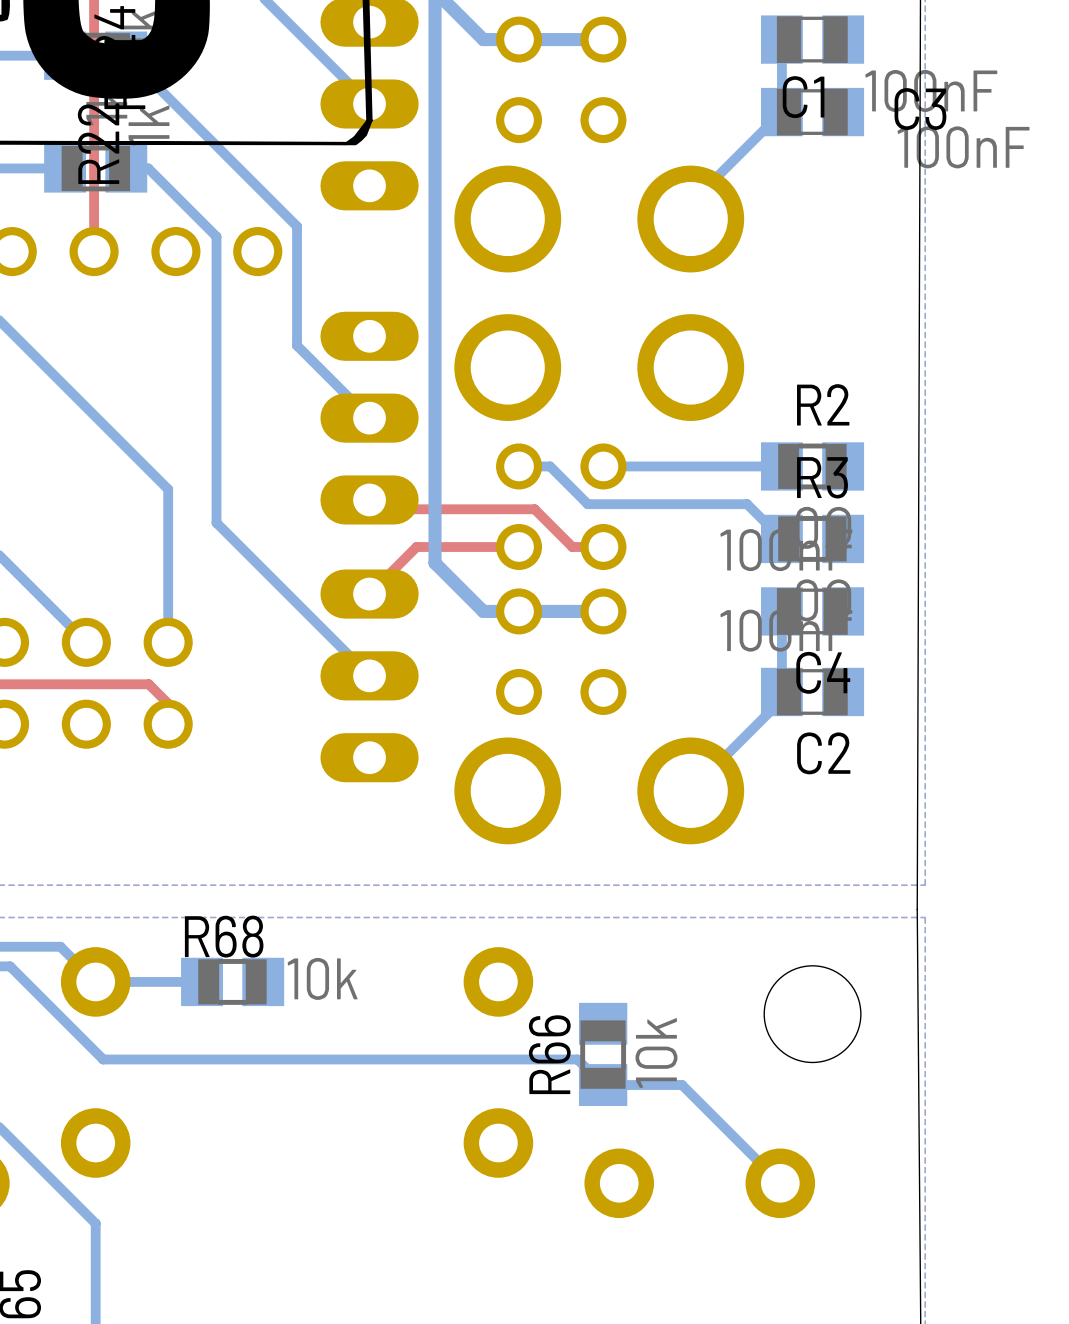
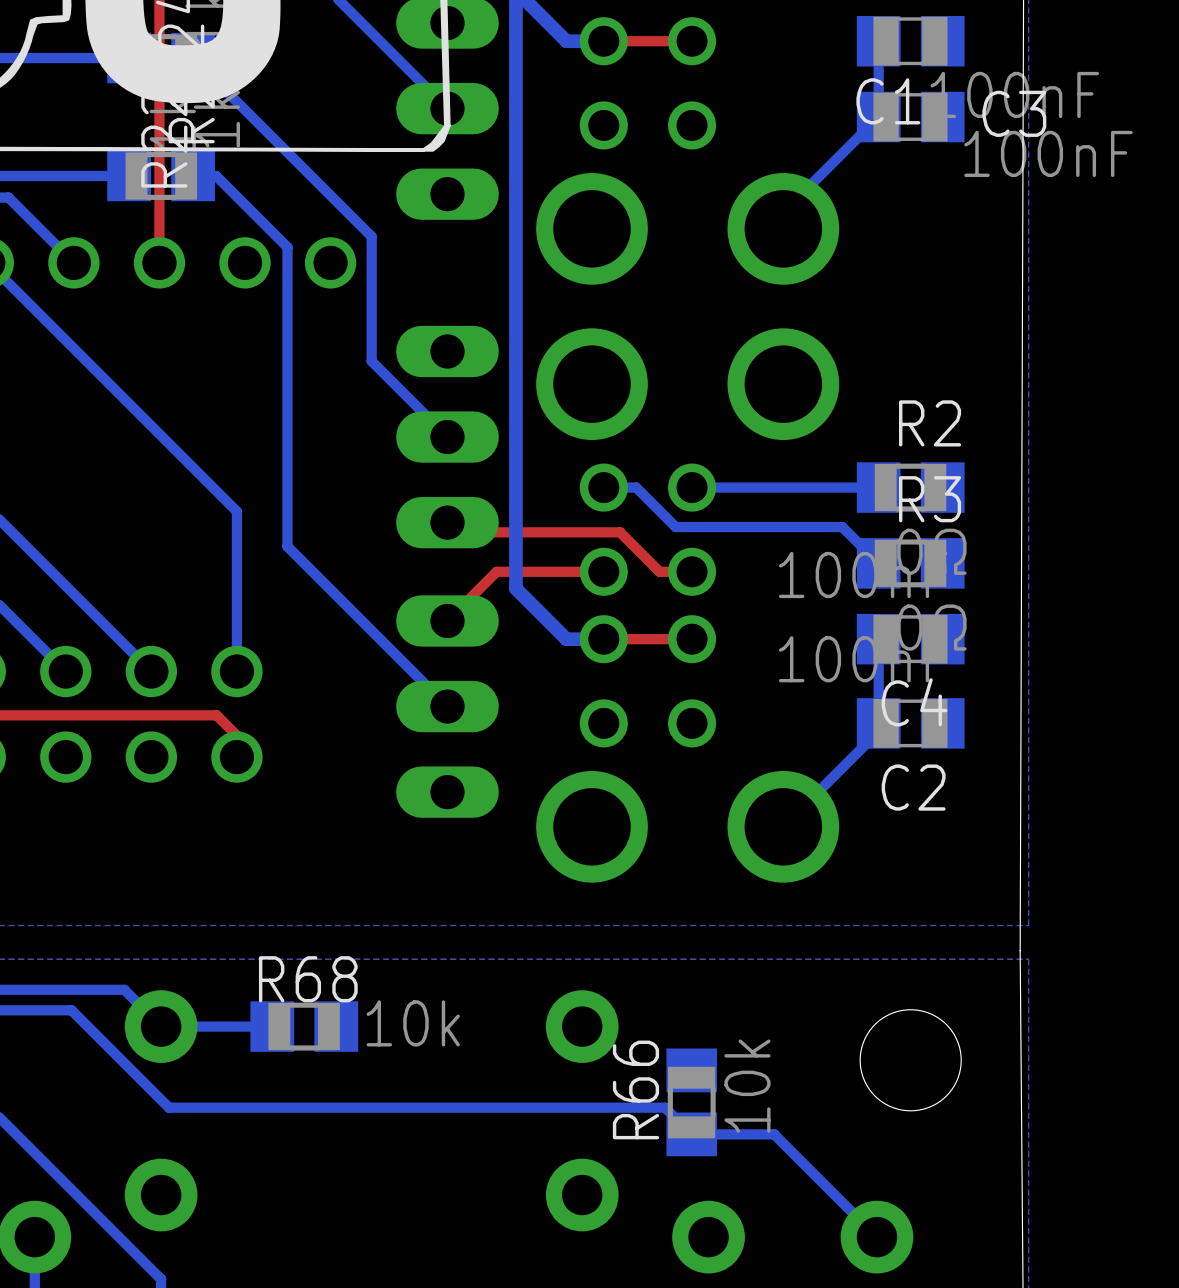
bottom track: (603, 39) (519, 39) -> none
top track: none -> (692, 41) (603, 41)
bottom track: (603, 611) (519, 611) -> none
top track: none -> (692, 639) (603, 639)

